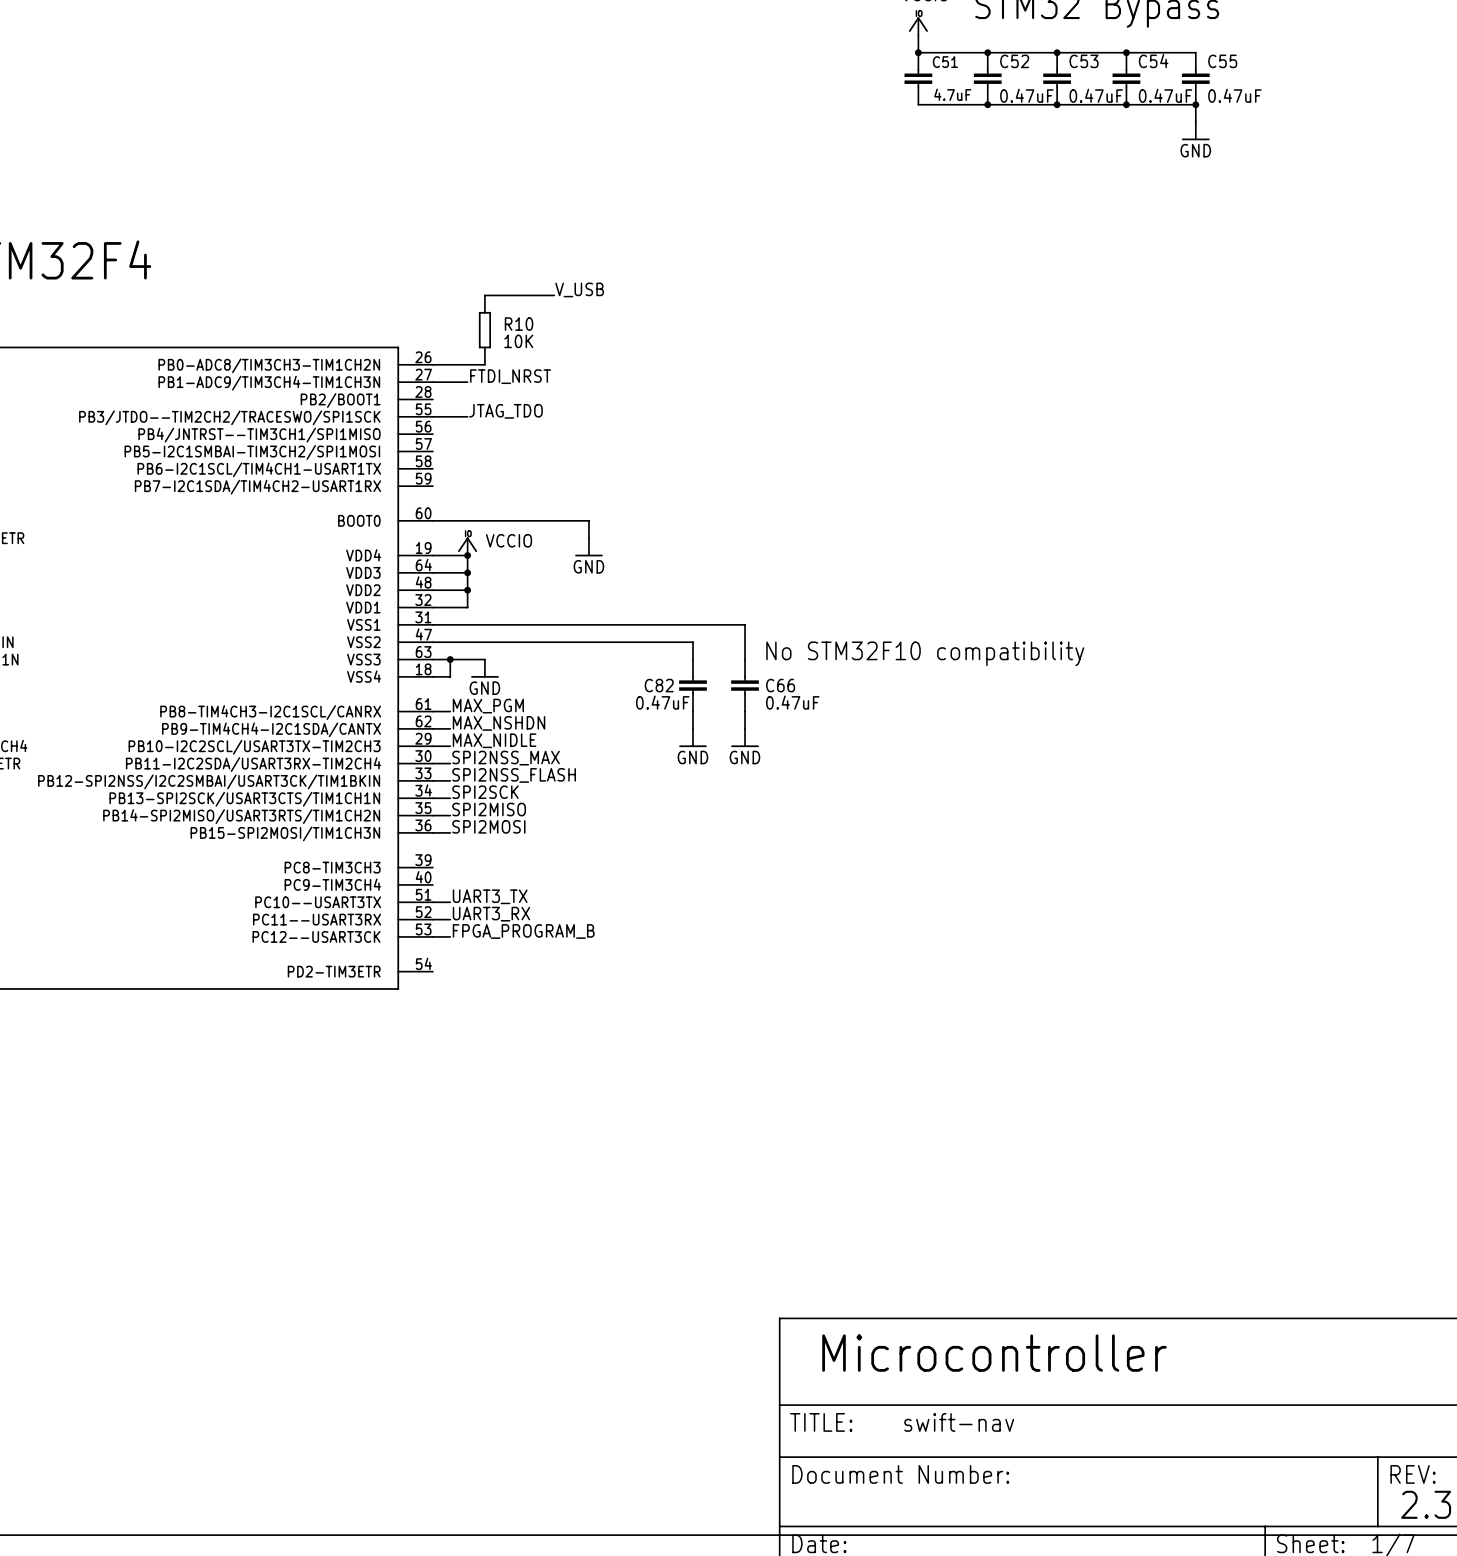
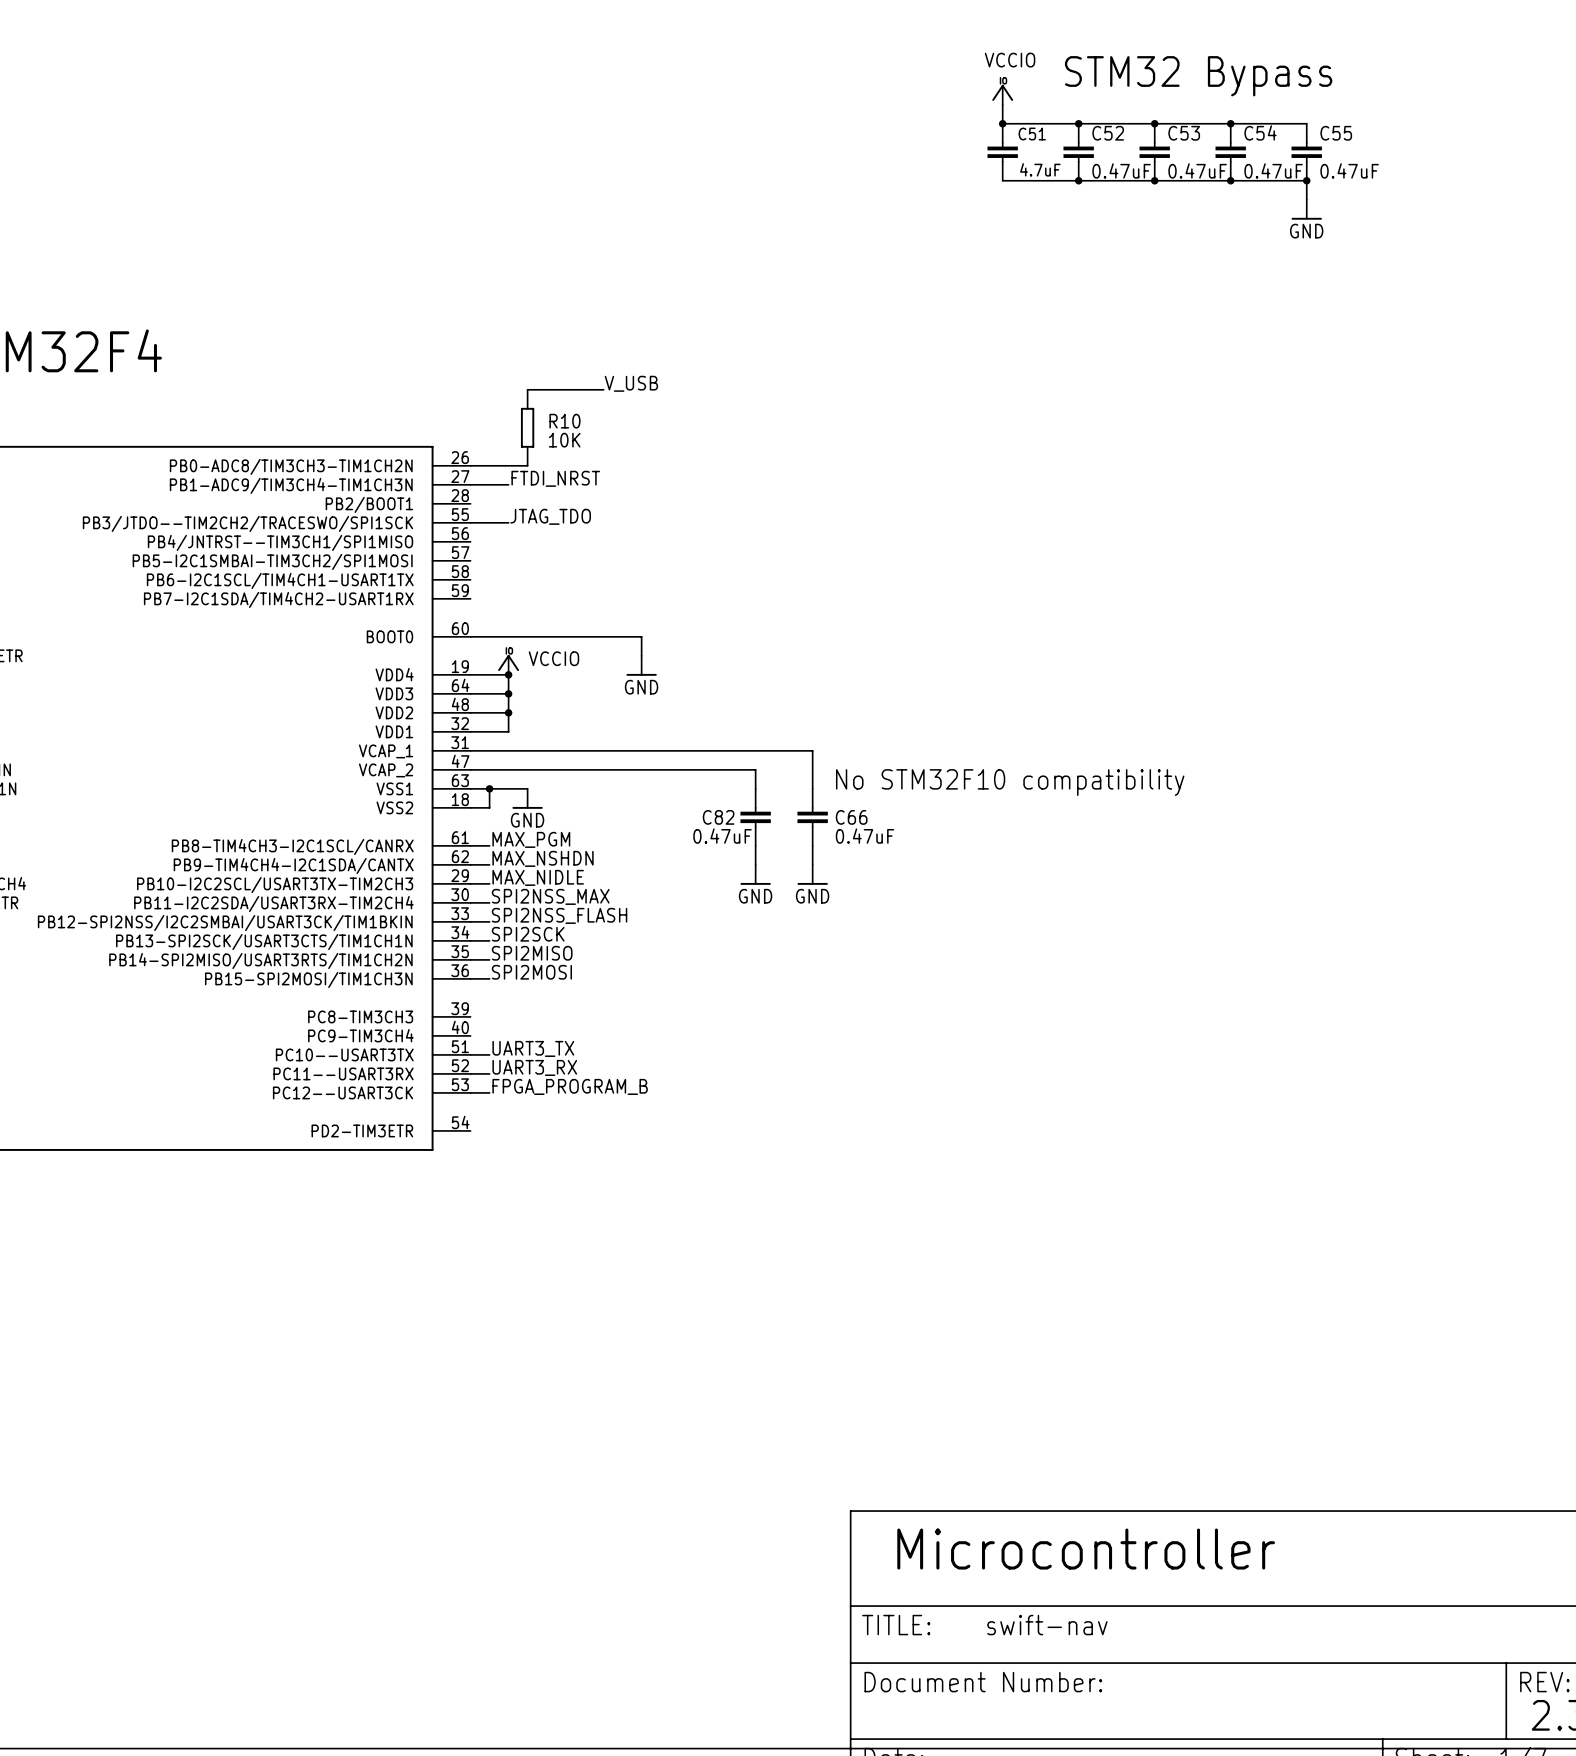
part pin name: VSS1 (363, 624) -> VCAP_1 (386, 751)
part pin name: VSS2 (363, 642) -> VCAP_2 (386, 770)
part pin name: VSS3 (363, 659) -> VSS1 (394, 788)
part pin name: VSS4 (364, 676) -> VSS2 (394, 807)

